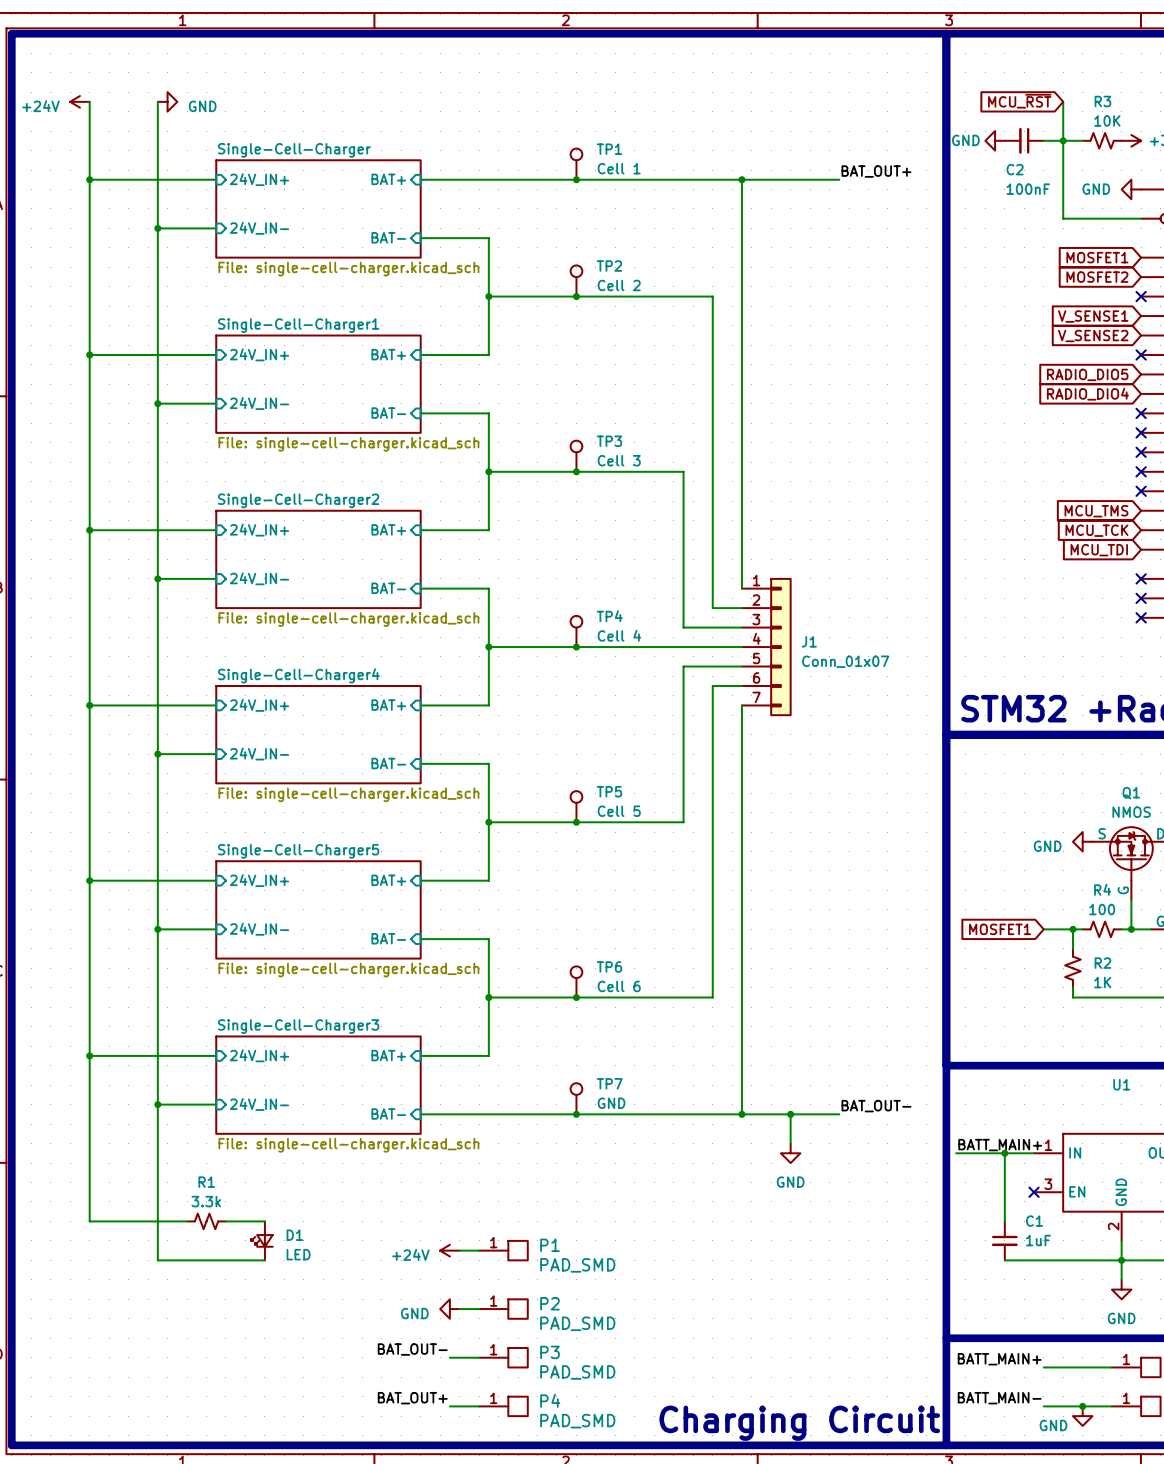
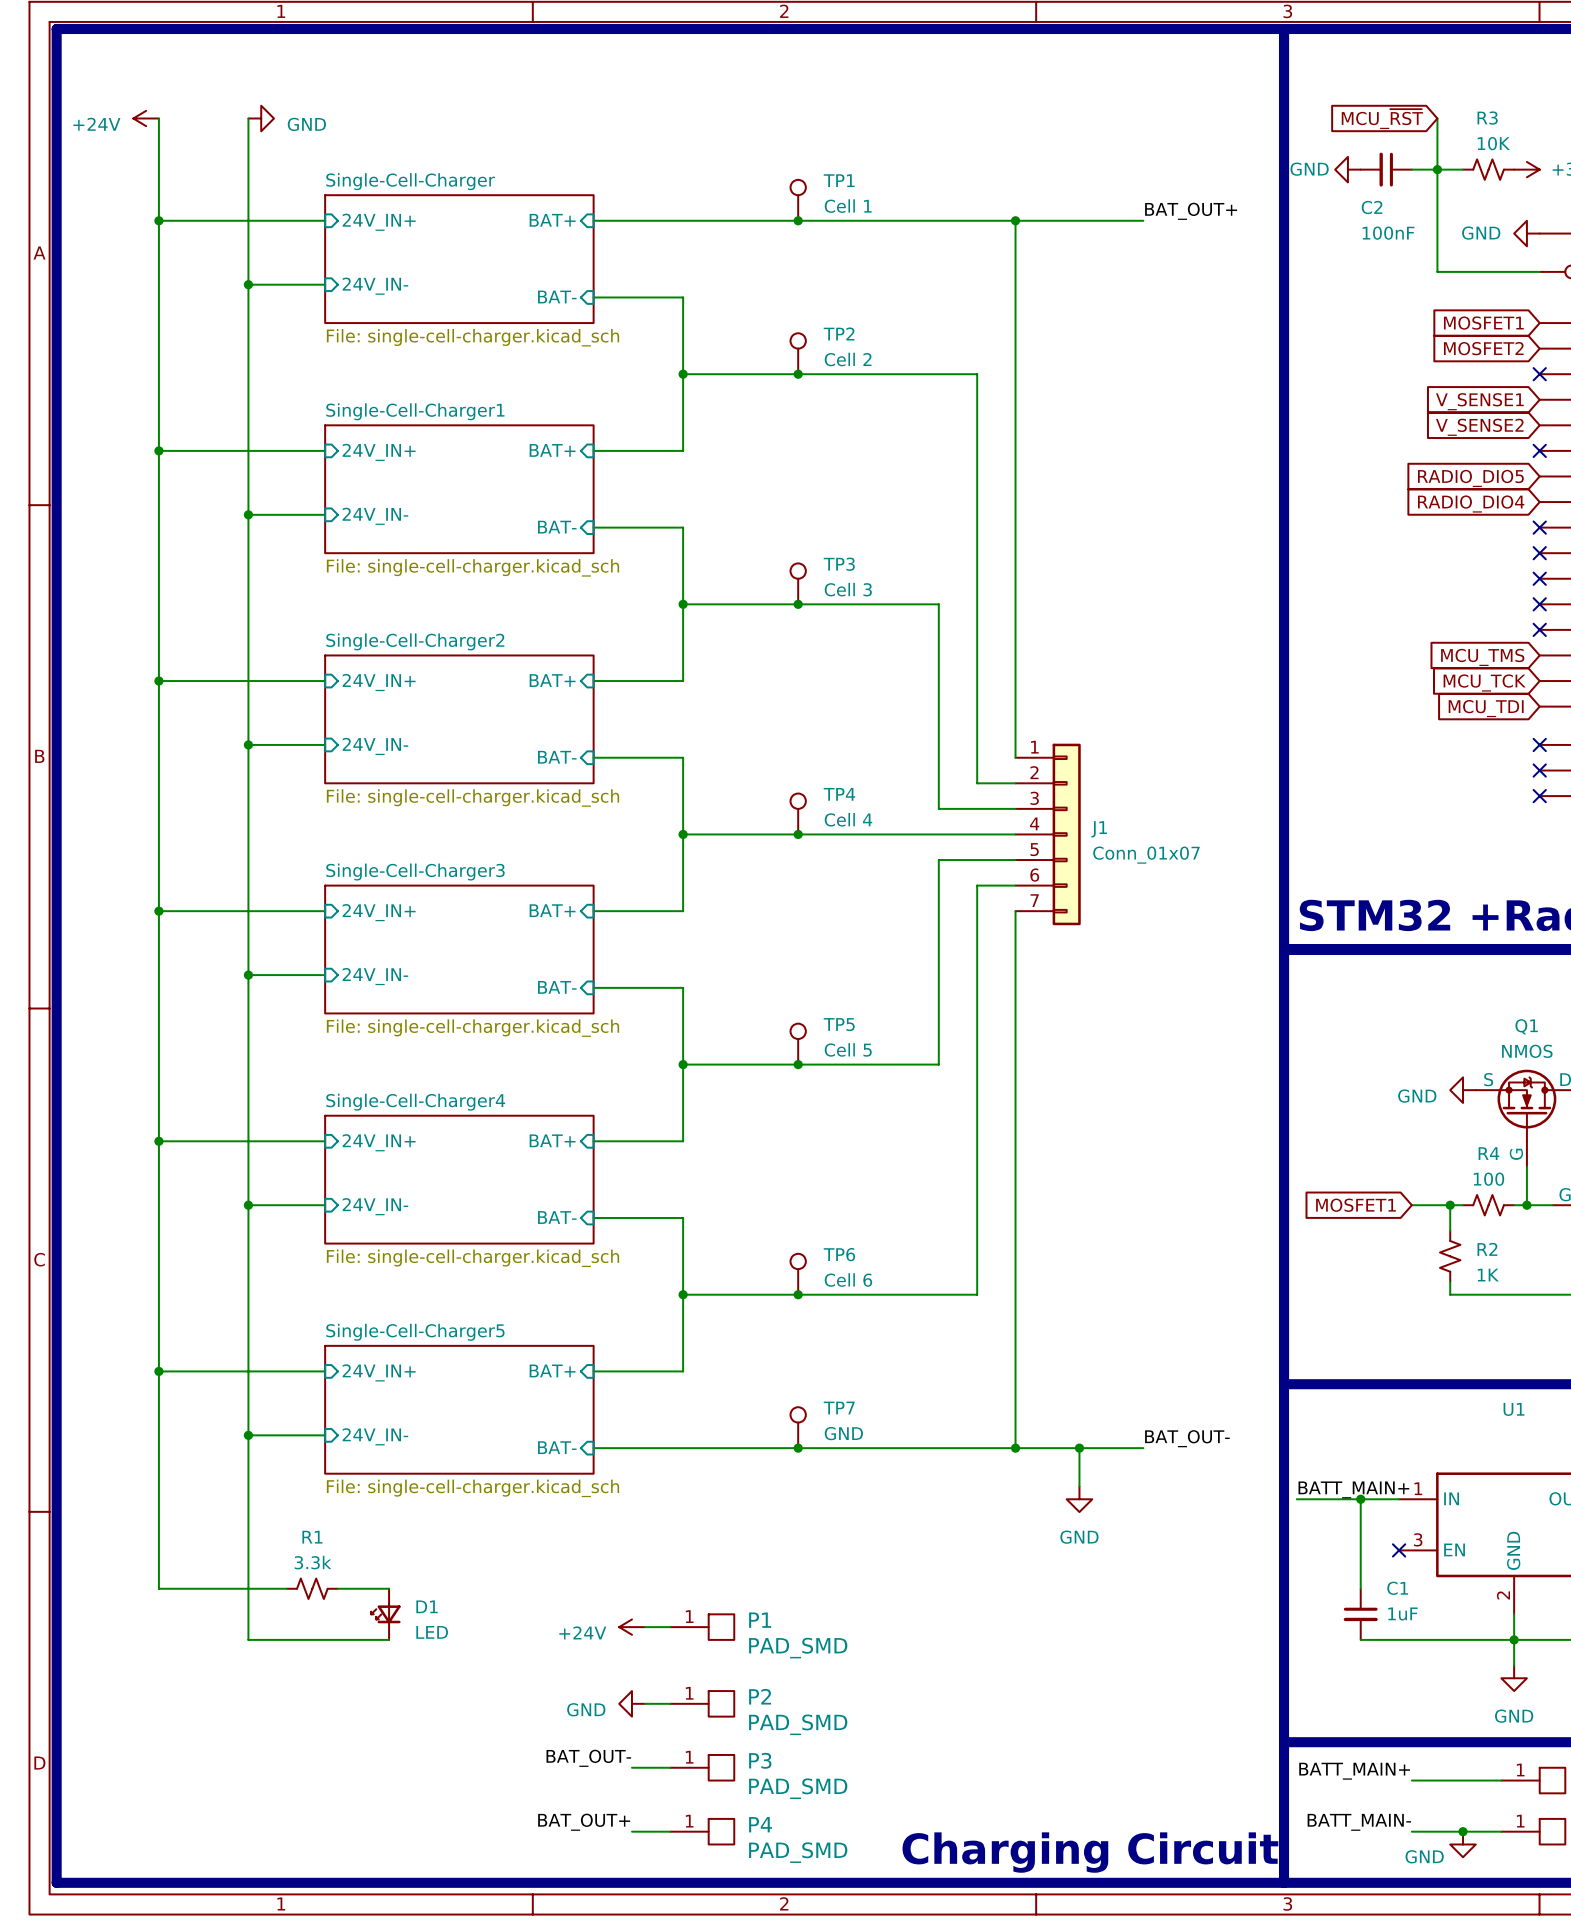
sheet Single-Cell-Charger4 name: Single-Cell-Charger4 (298, 675) -> Single-Cell-Charger3 (415, 872)
sheet Single-Cell-Charger5 name: Single-Cell-Charger5 (298, 851) -> Single-Cell-Charger4 (415, 1102)
sheet Single-Cell-Charger3 name: Single-Cell-Charger3 (298, 1026) -> Single-Cell-Charger5 (415, 1332)

